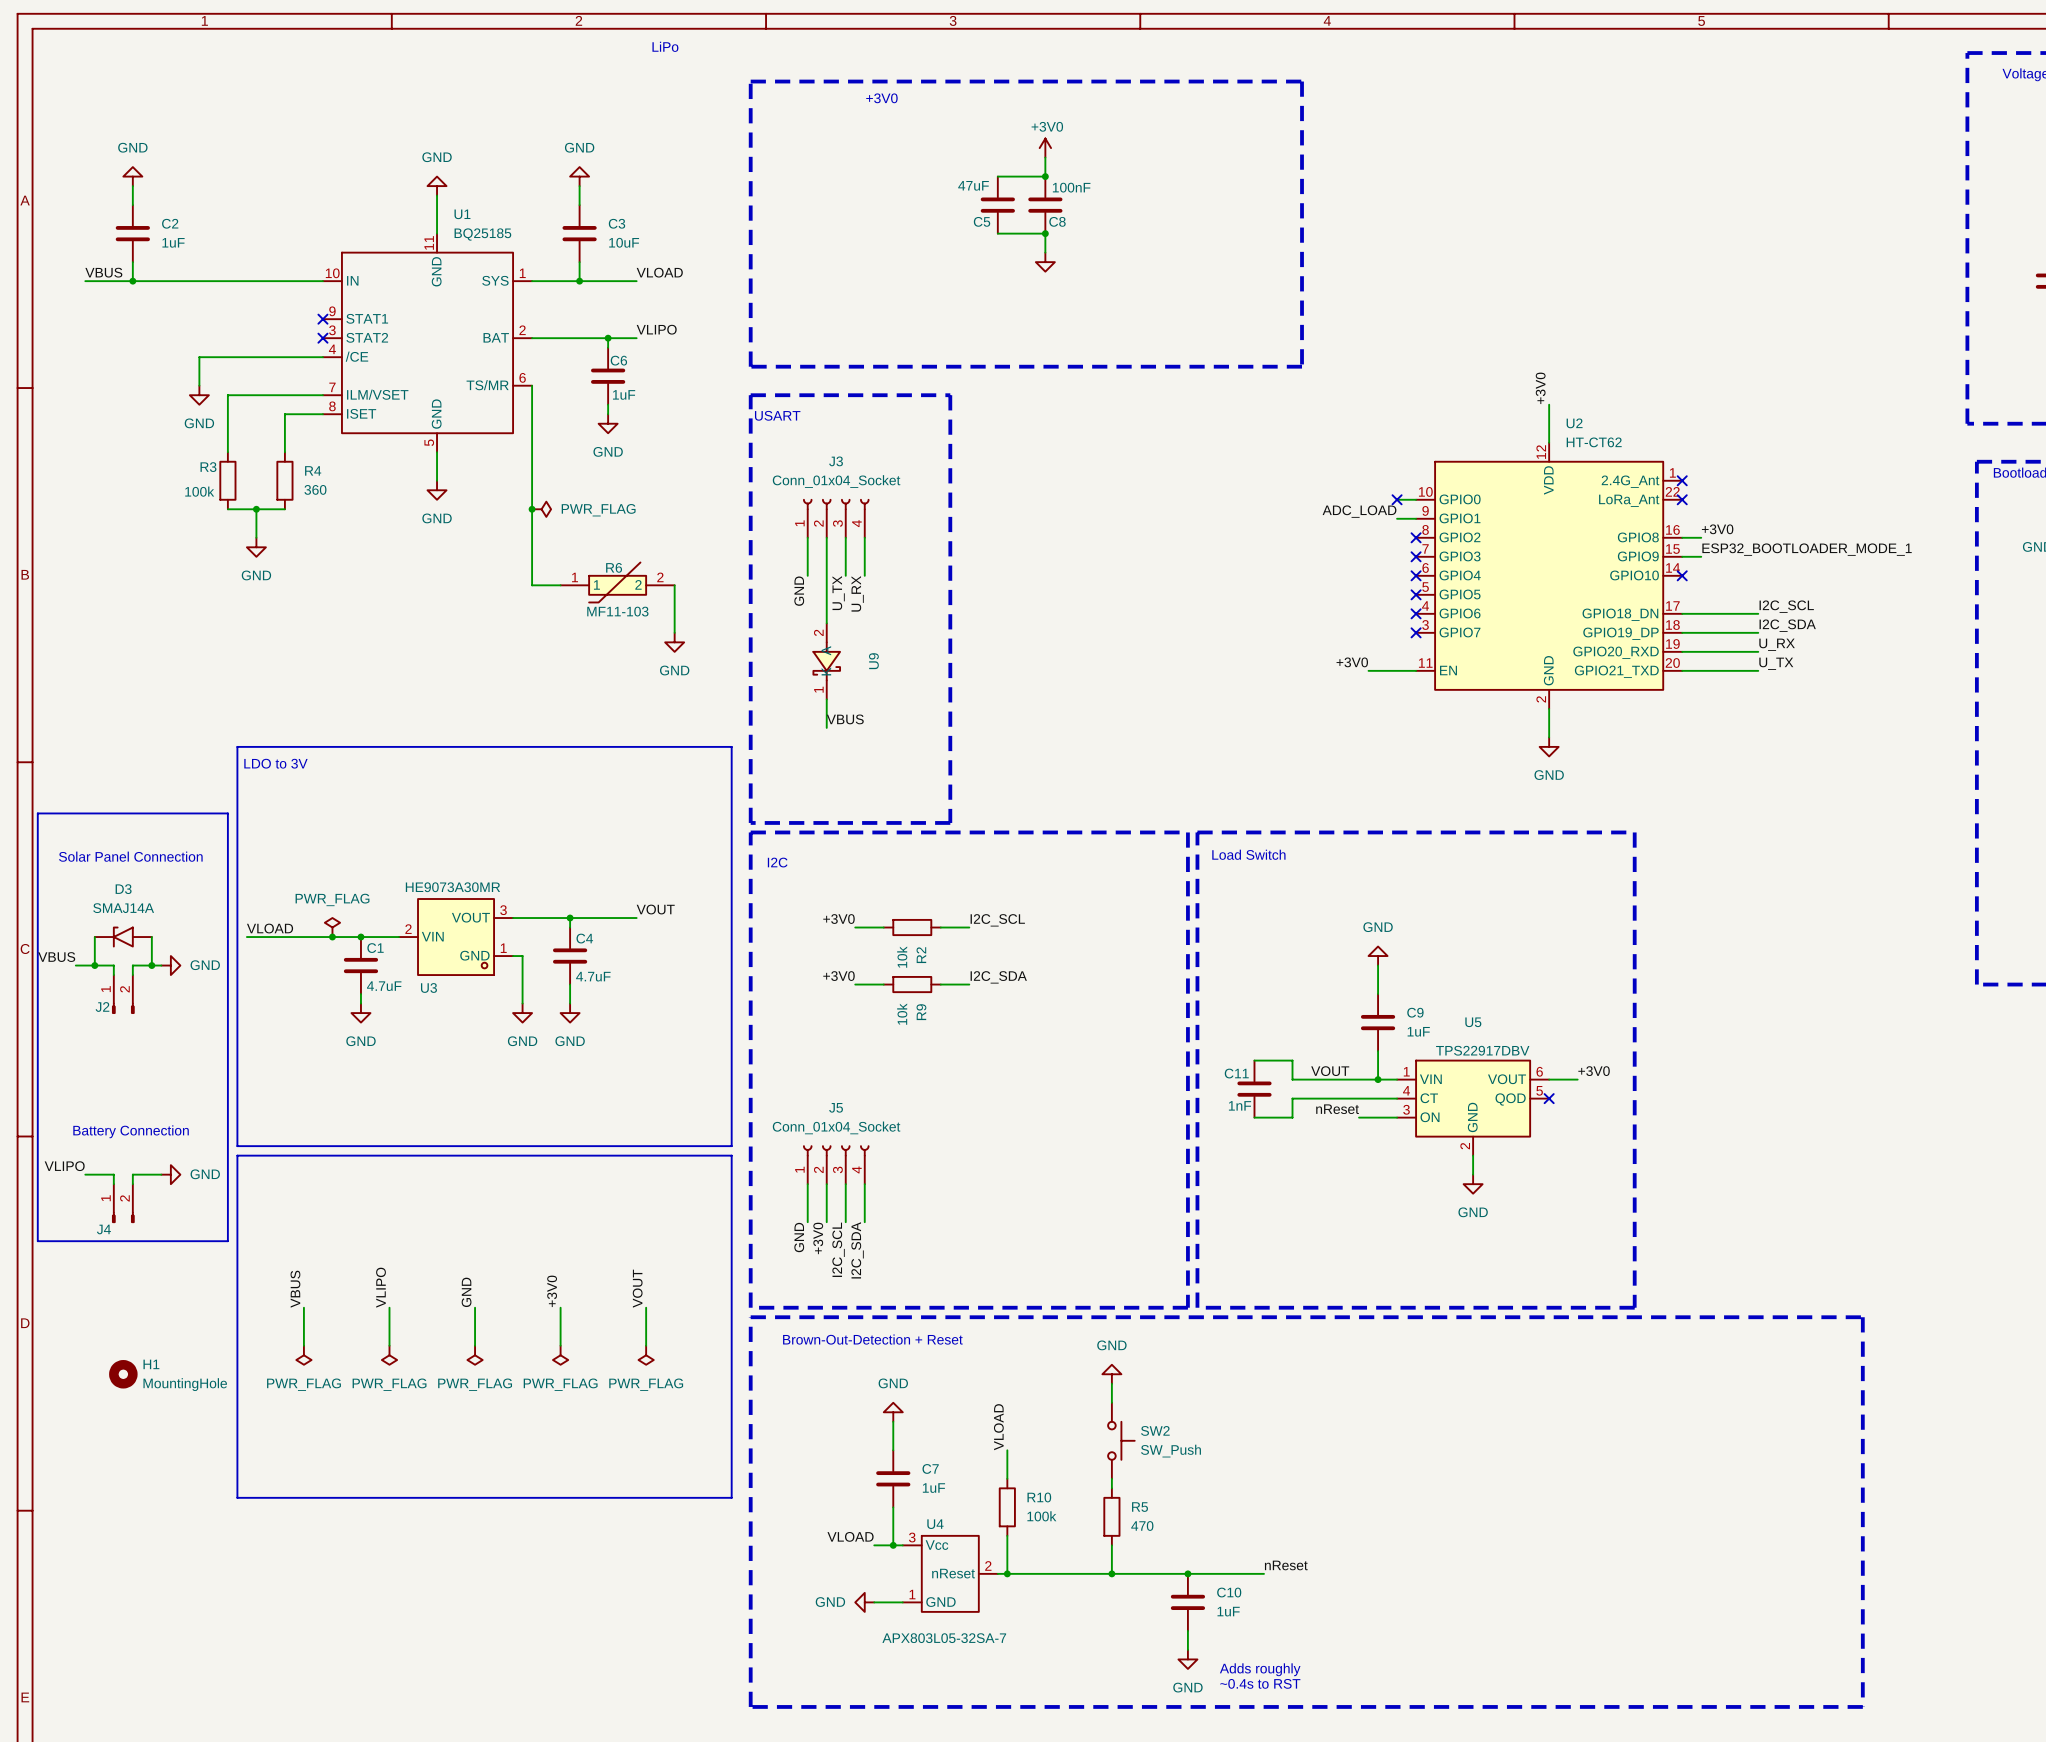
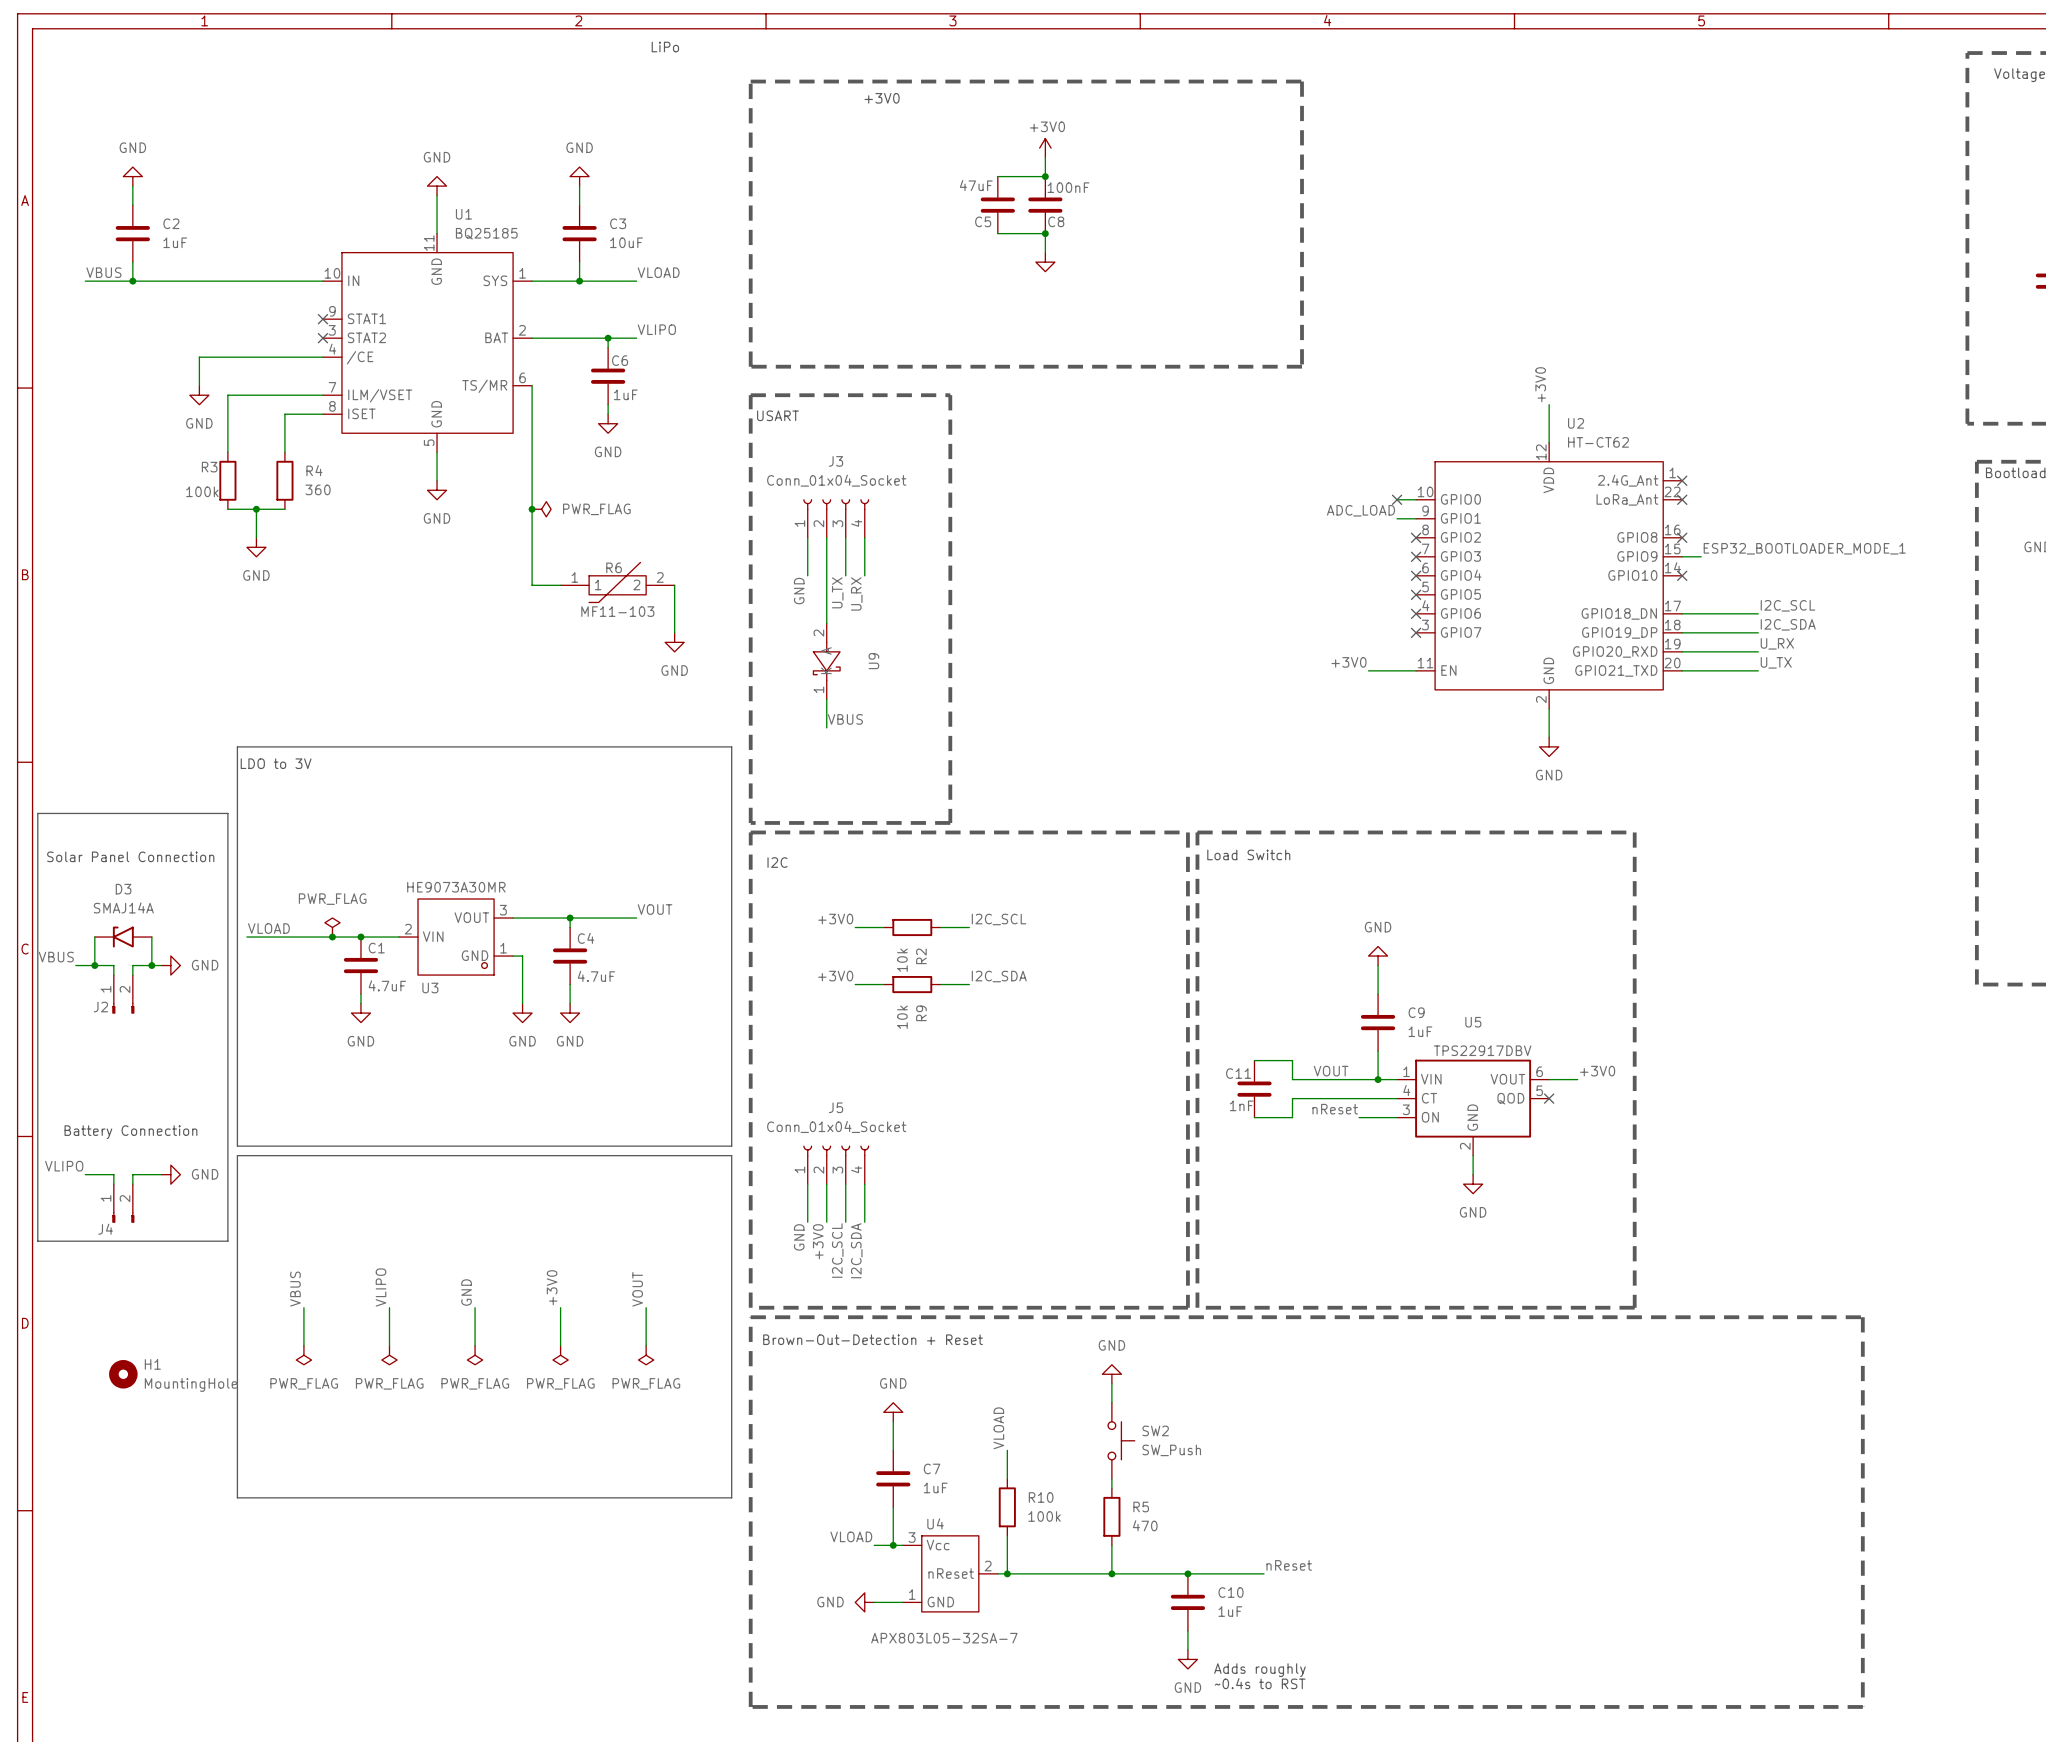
label: +3V0 (1717, 529) -> none
wire: (1682, 537) (1701, 537) -> none
no-connect mark: none -> (1682, 537)

